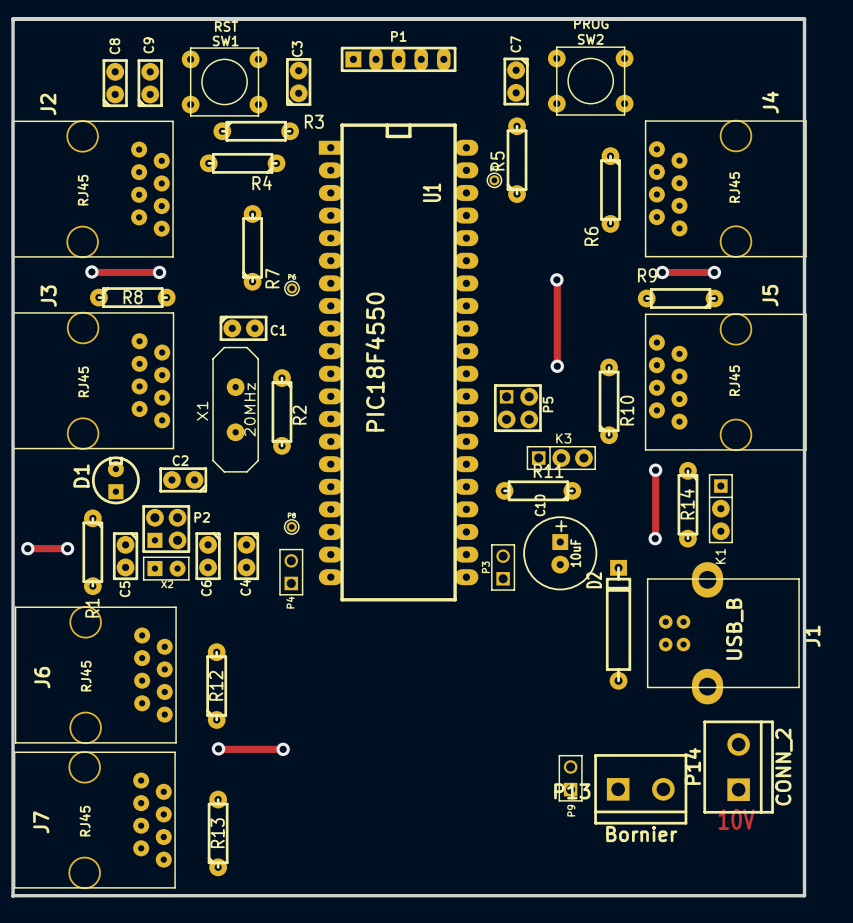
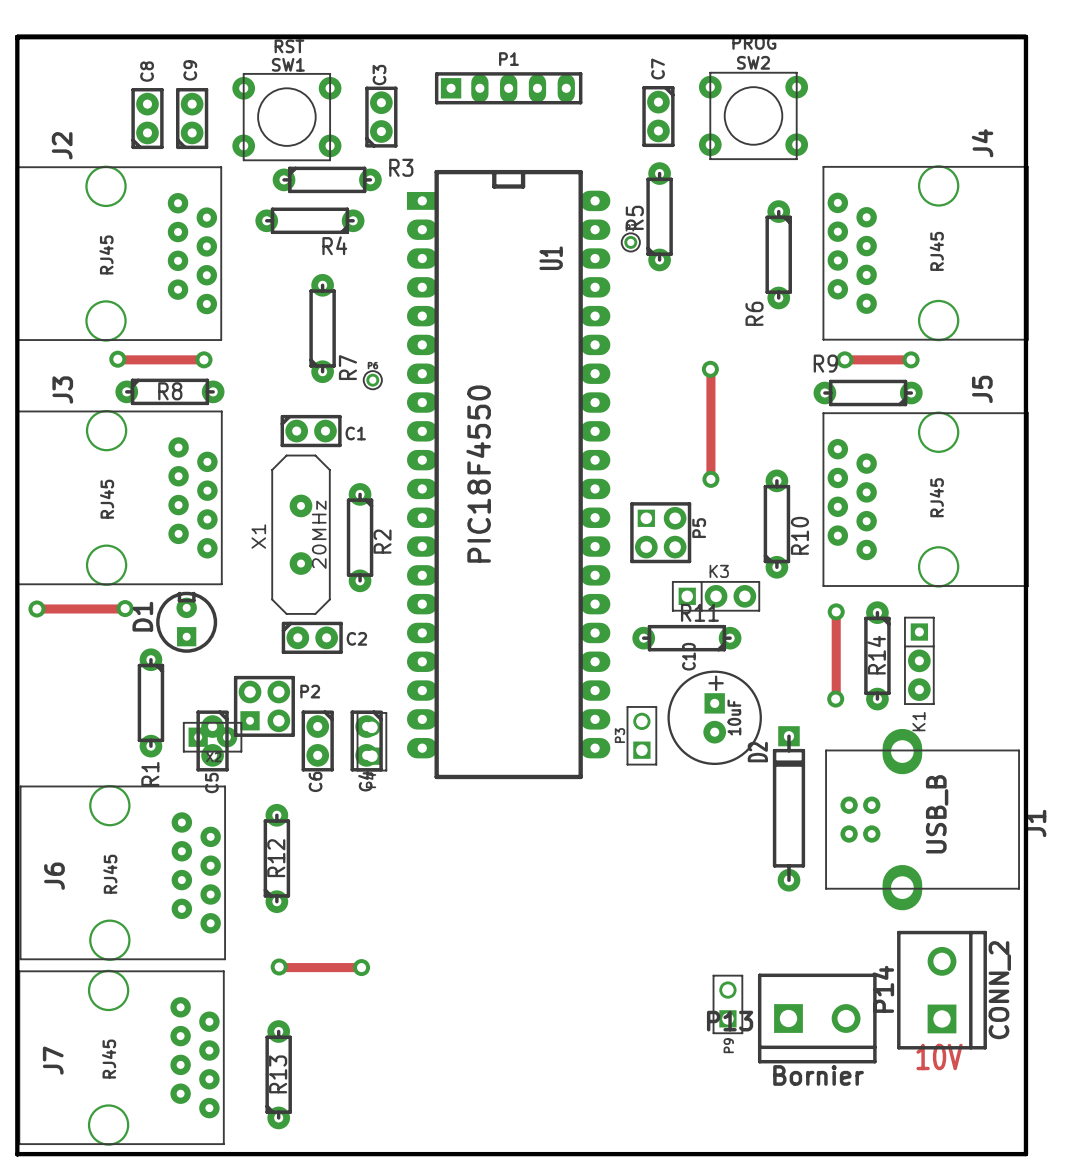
C2 name position: C2 (180, 460) -> C2 (356, 638)
via: none -> (36, 608)
track: none -> (125, 608) (36, 608)
via: none -> (125, 608)
C2 rotation: 0° (183, 479) -> 180° (312, 637)
C2 position: (183, 479) -> (312, 637)
D1 position: (115, 480) -> (186, 622)
R1 footprint: [82, 509, 104, 596] -> [137, 648, 165, 758]
part: (291, 526) -> none
P2 position: (166, 529) -> (264, 706)
track: (27, 548) (67, 548) -> none
via: (27, 548) -> none
via: (67, 548) -> none
C5 position: (125, 556) -> (212, 740)
C6 position: (208, 556) -> (317, 740)
C4 position: (246, 556) -> (366, 740)
R12 position: (216, 686) -> (276, 858)

